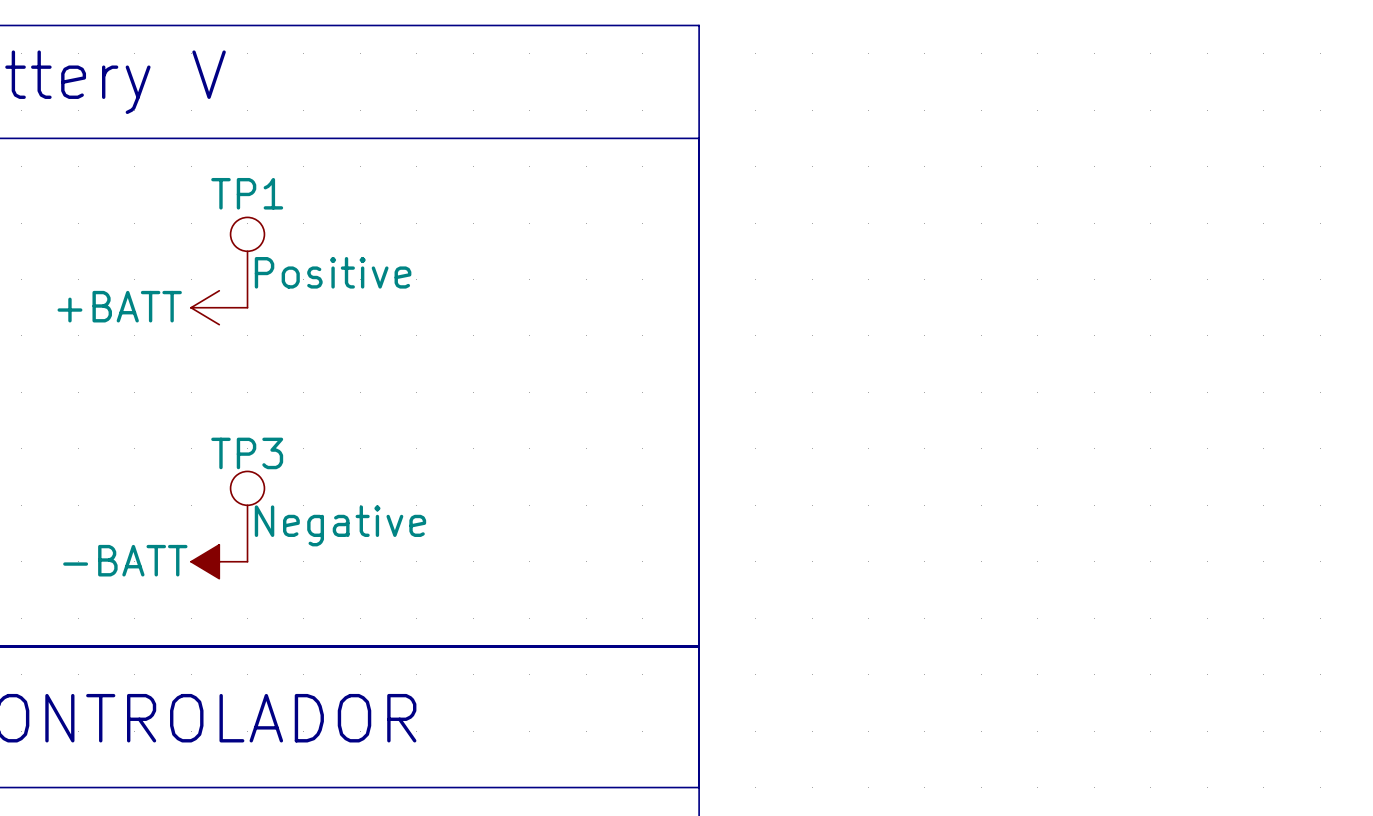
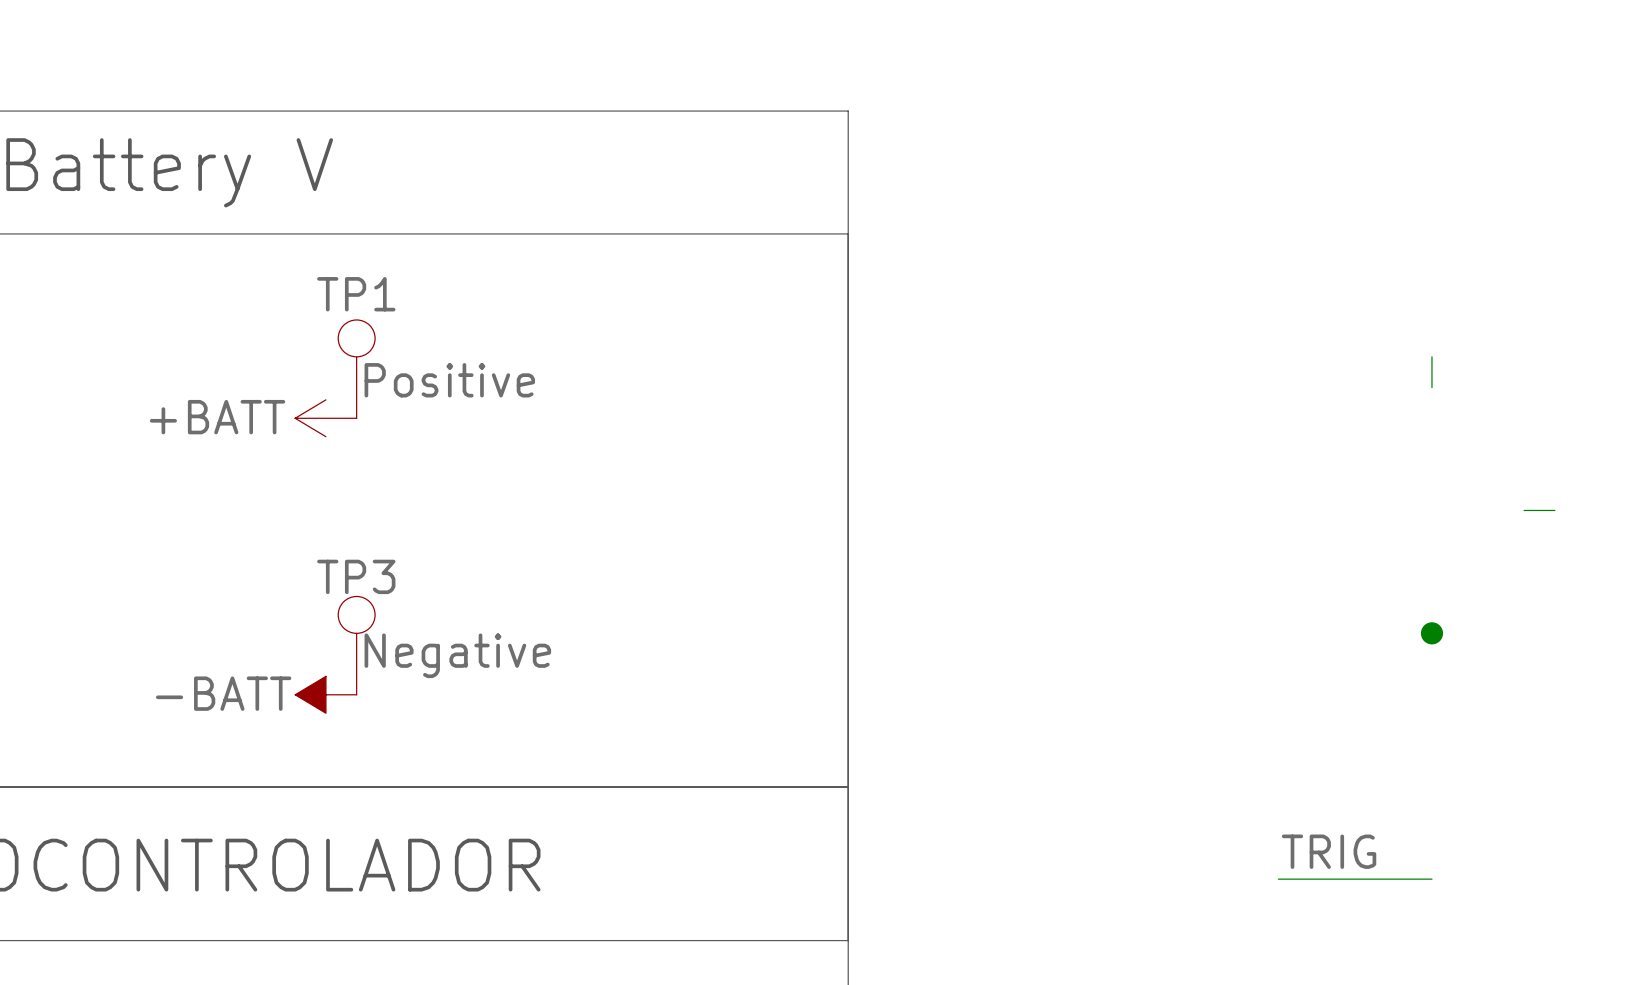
wire: none -> (1431, 356) (1431, 387)
wire: none -> (1524, 510) (1554, 510)
junction: none -> (1431, 633)
label: none -> TRIG (1329, 851)
wire: none -> (1278, 879) (1431, 879)

